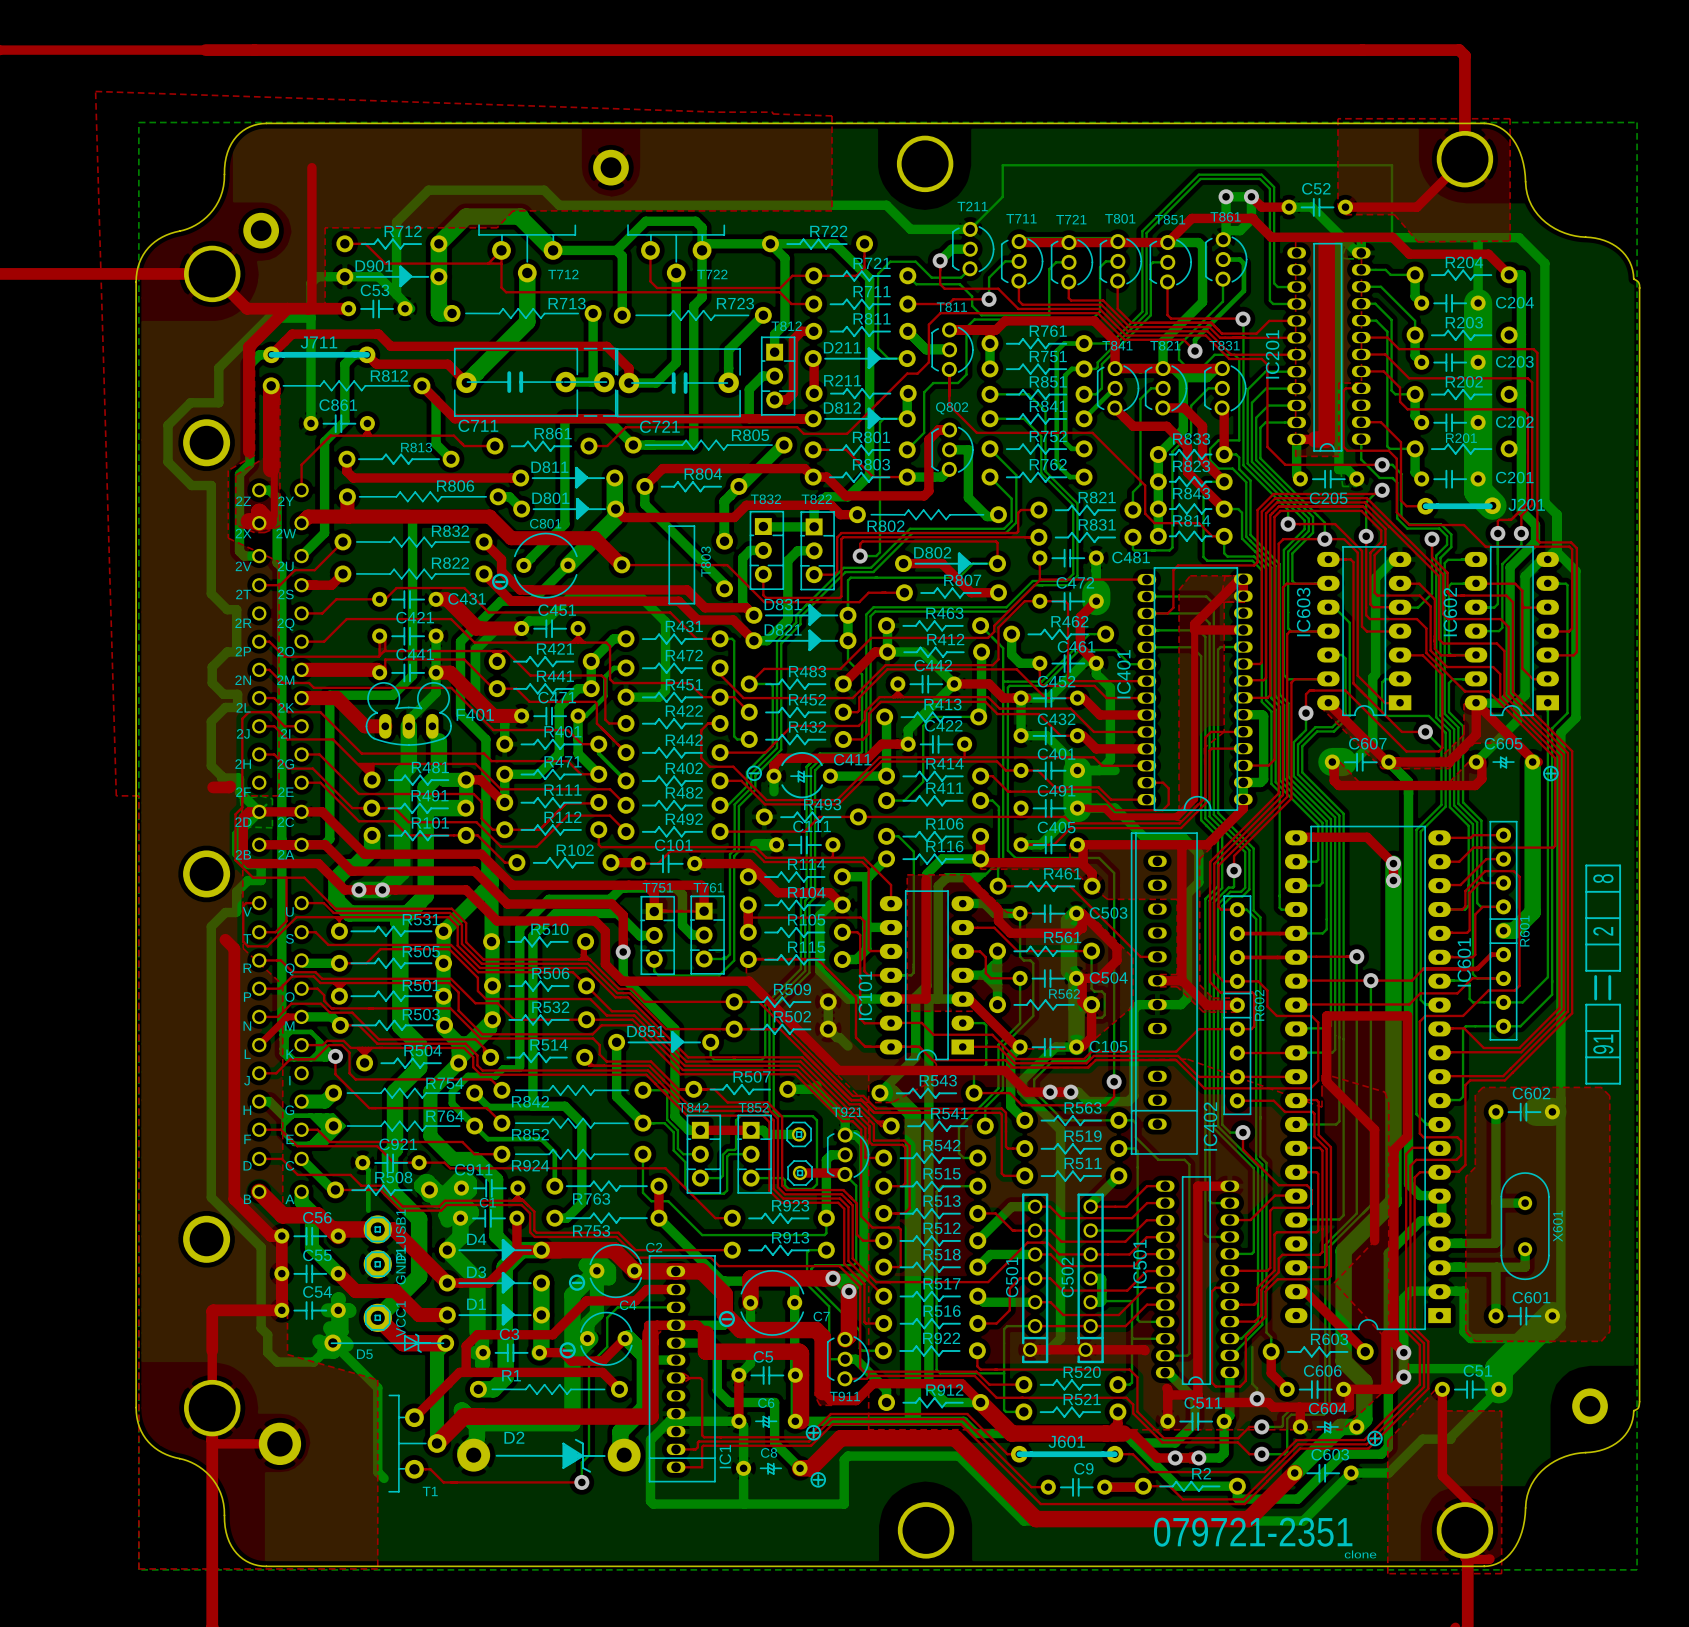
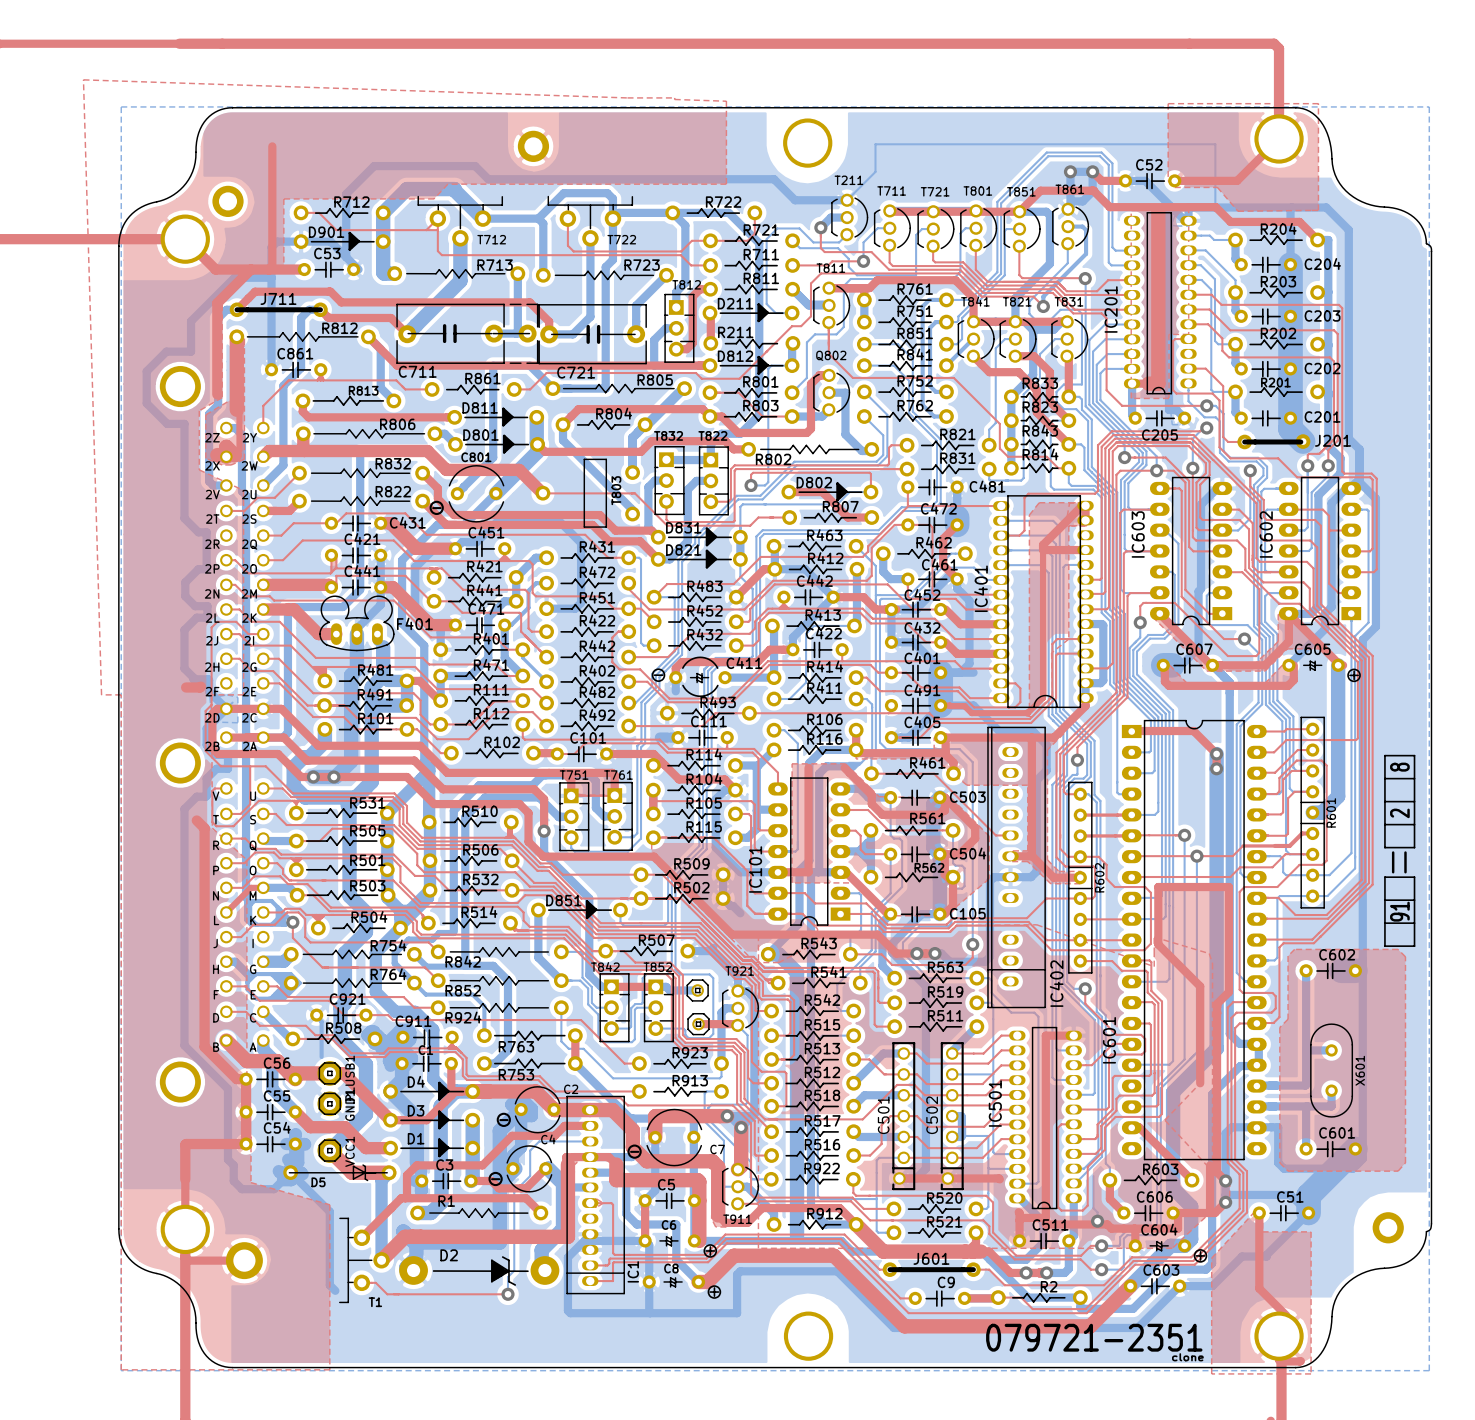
IC601 footprint: [1284, 825, 1451, 1330] -> [1121, 720, 1267, 1161]
IC601 name position: IC601 (1464, 962) -> IC601 (1109, 1040)

